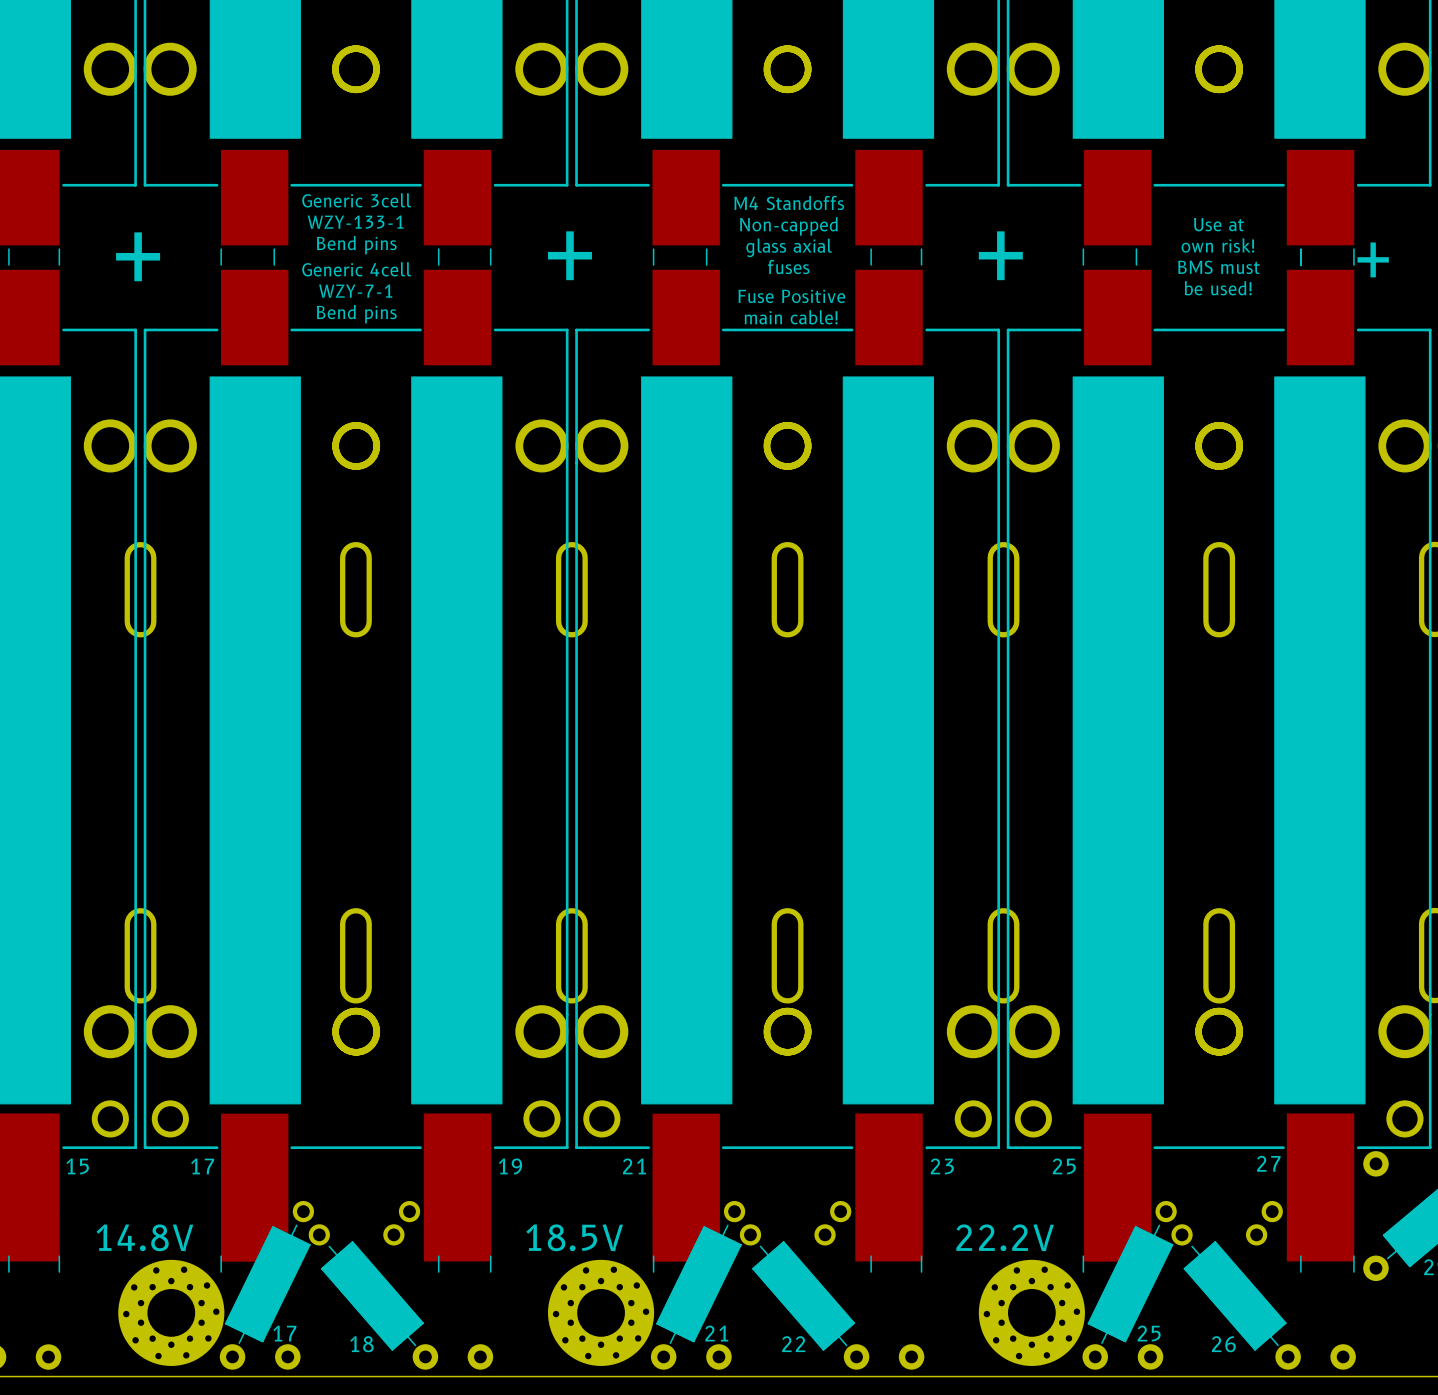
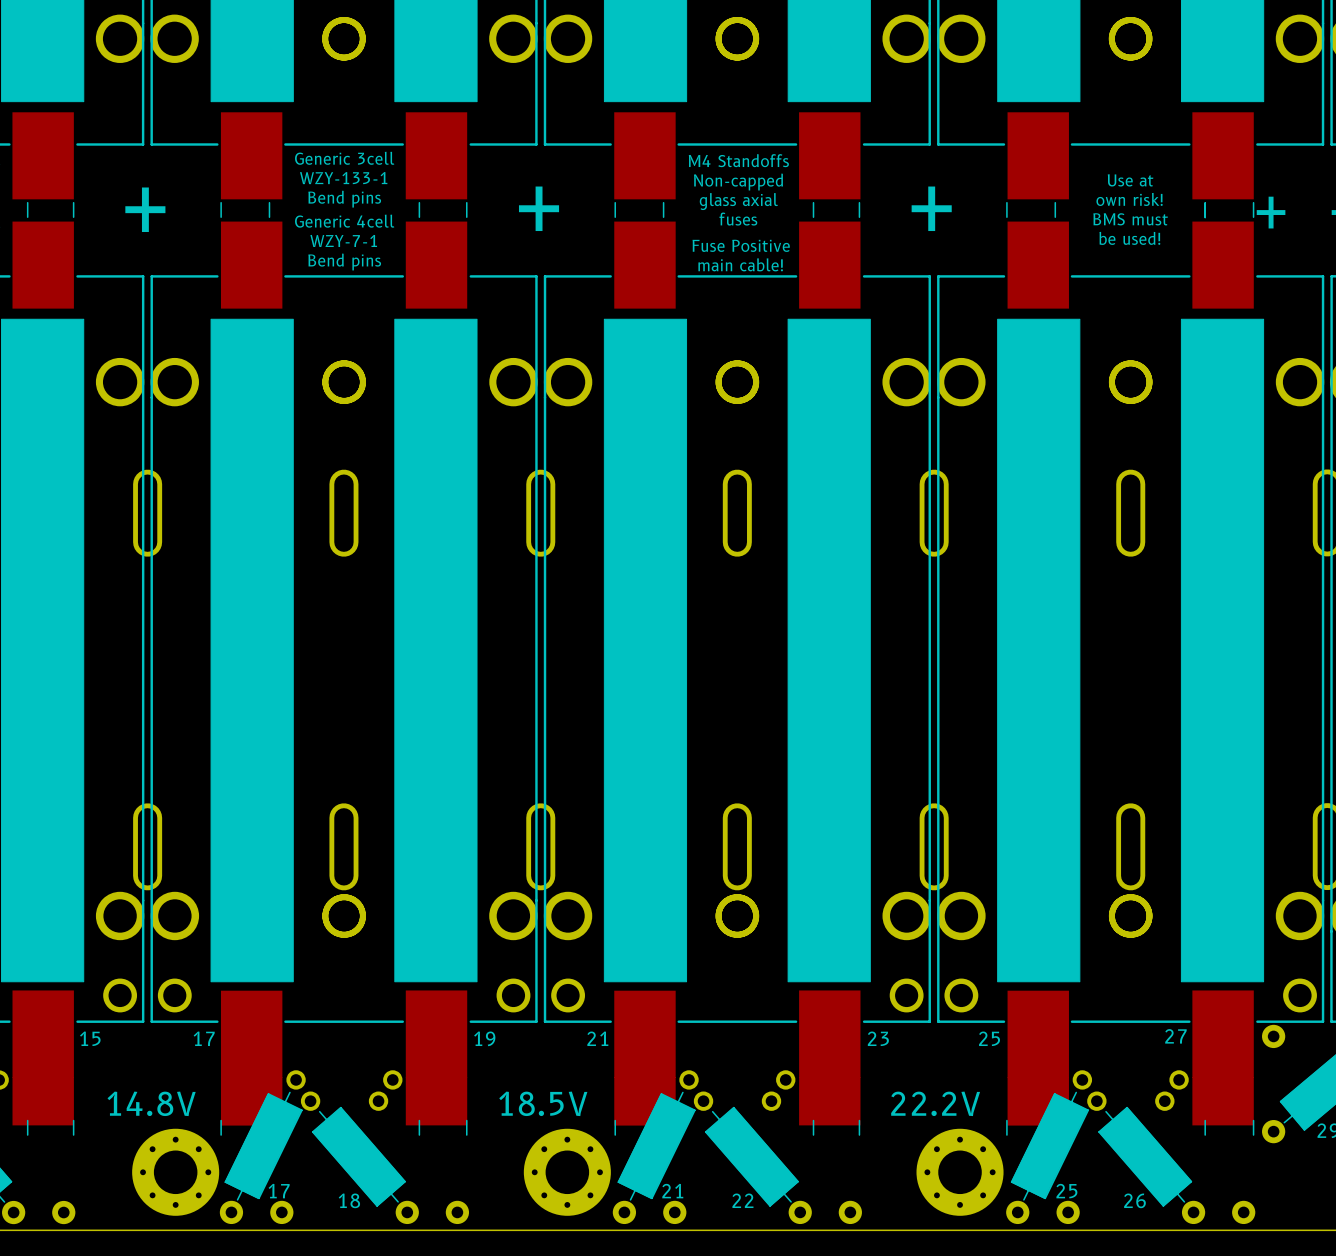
part footprint: [118, 1259, 225, 1366] -> [132, 1128, 220, 1216]
part footprint: [548, 1259, 655, 1366] -> [523, 1128, 611, 1216]
part footprint: [978, 1259, 1085, 1366] -> [916, 1128, 1004, 1216]

